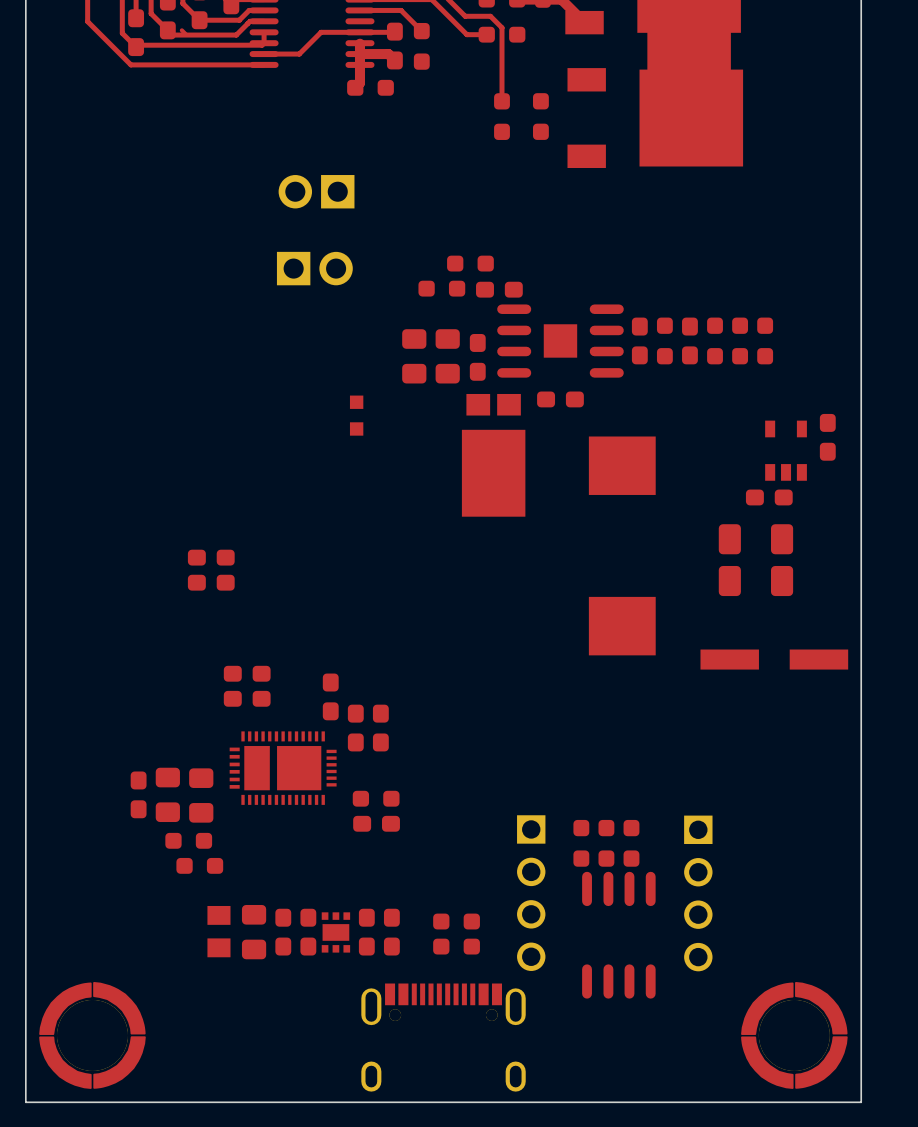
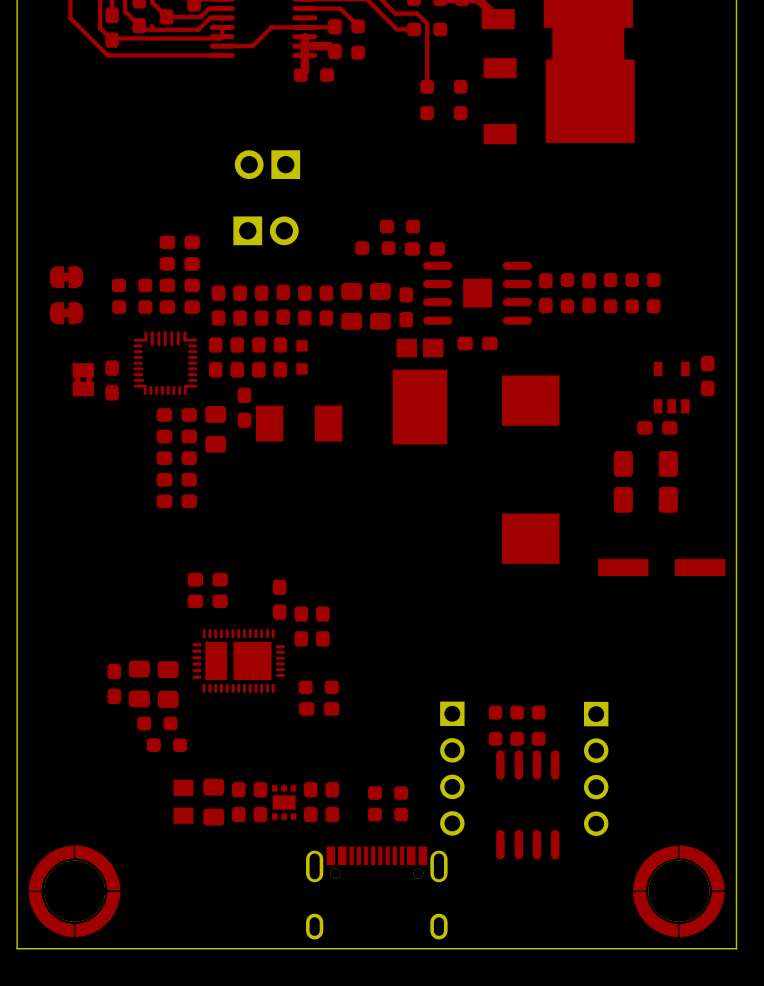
part: none -> (179, 242)
part: none -> (179, 263)
part: none -> (66, 277)
part: none -> (132, 285)
part: none -> (179, 285)
part: none -> (283, 304)
part: none -> (218, 305)
part: none -> (240, 305)
part: none -> (261, 305)
part: none -> (304, 305)
part: none -> (326, 305)
part: none -> (132, 307)
part: none -> (179, 307)
part: none -> (66, 313)
part: none -> (215, 357)
part: none -> (237, 357)
part: none -> (258, 357)
part: none -> (280, 357)
part: none -> (165, 363)
part: none -> (83, 379)
part: none -> (112, 380)
part: none -> (244, 407)
part: none -> (176, 414)
part: none -> (299, 423)
part: none -> (215, 429)
part: none -> (176, 436)
part: none -> (176, 458)

